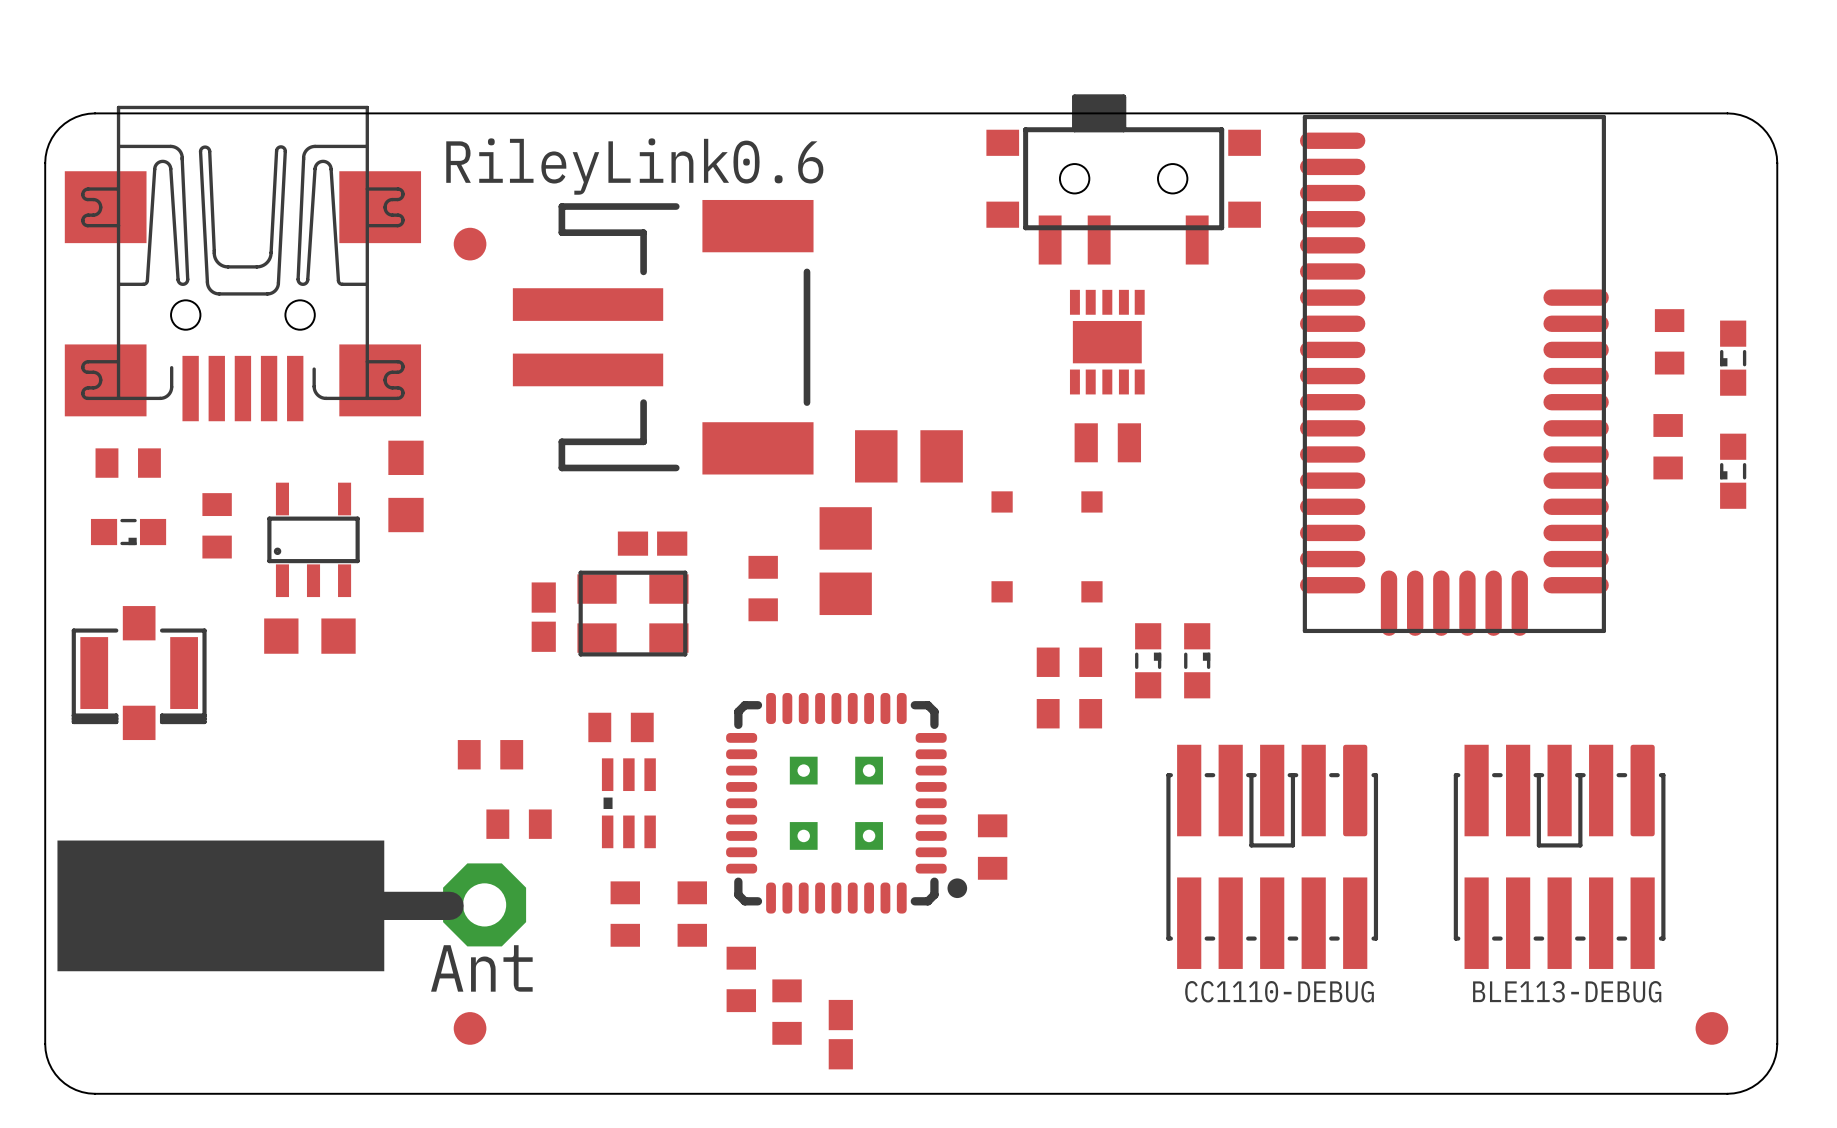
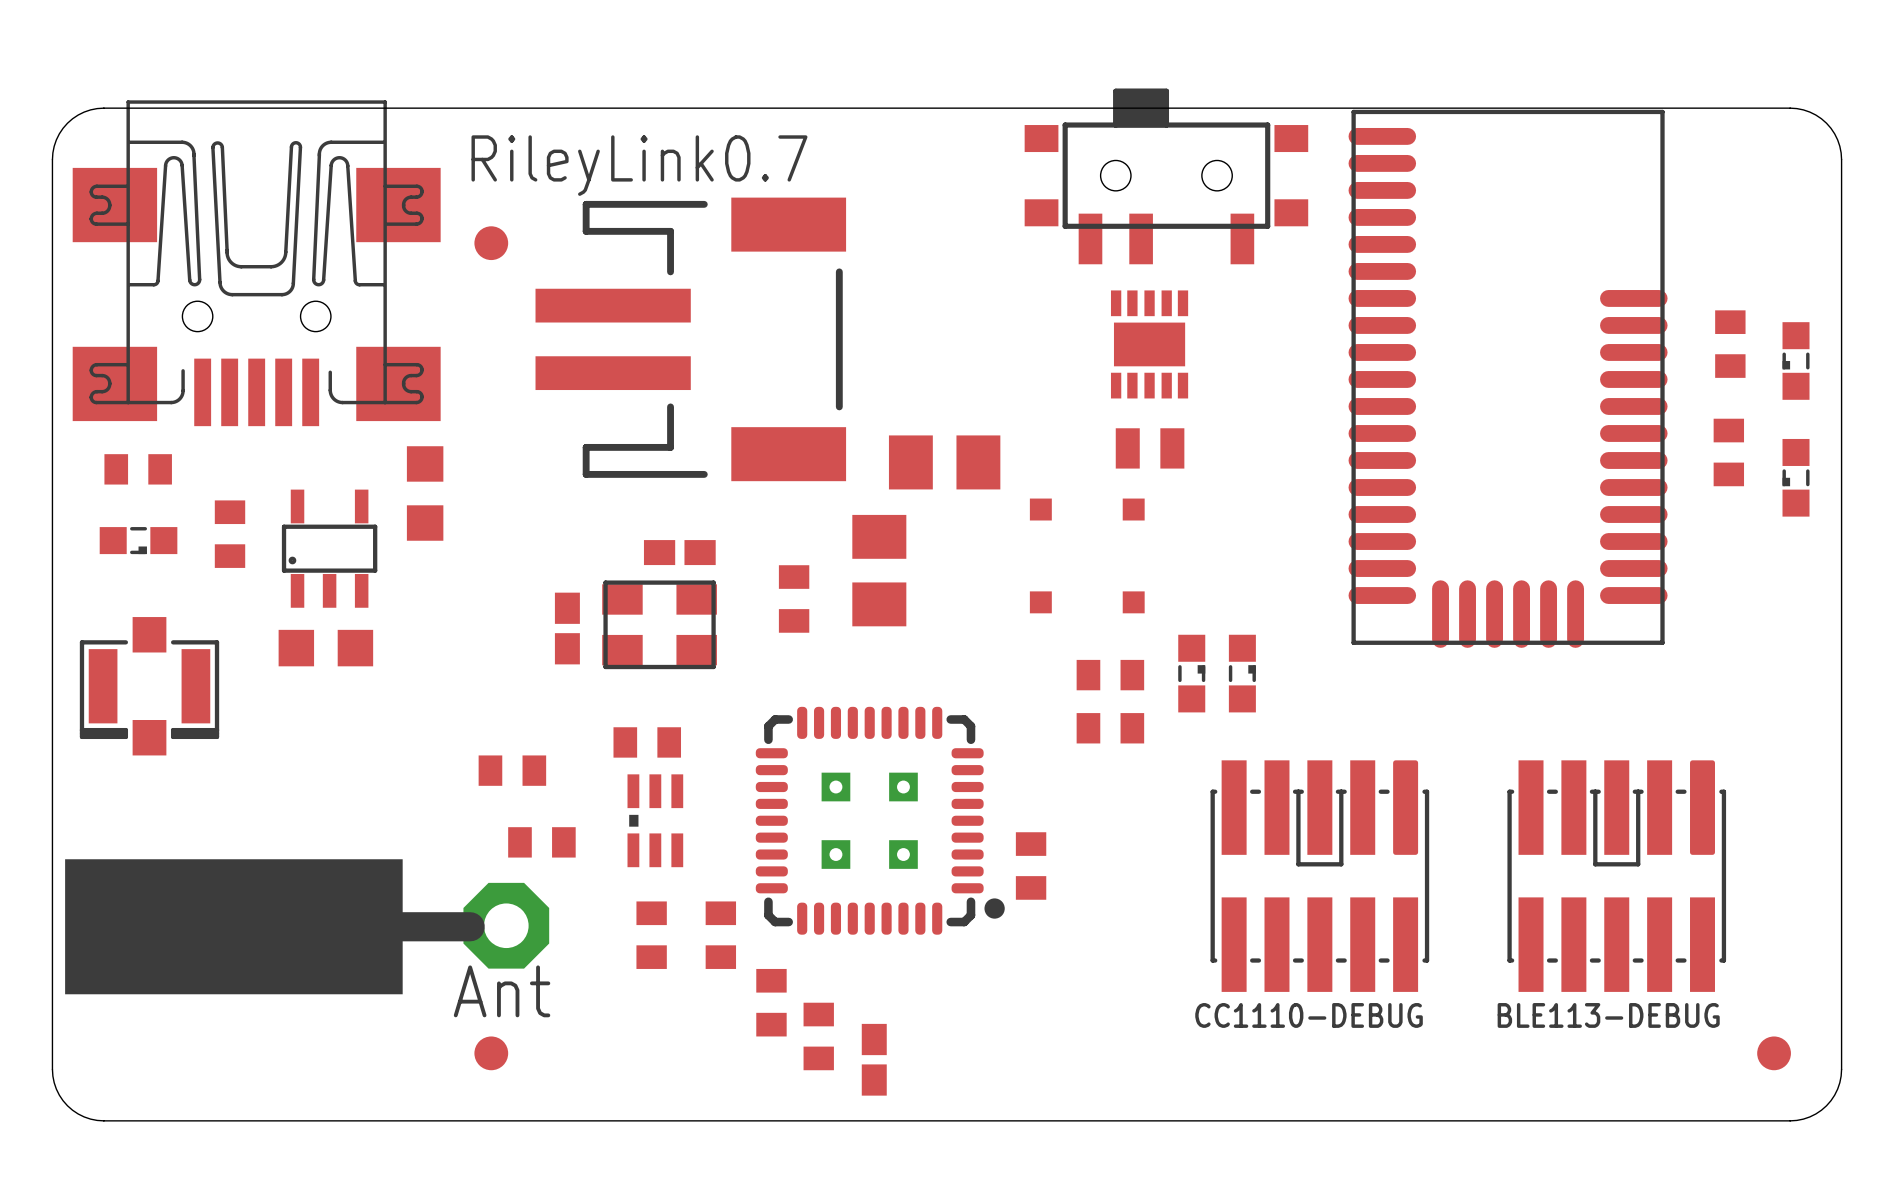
text: RileyLink0.6 (634, 166) -> RileyLink0.7 (639, 165)

